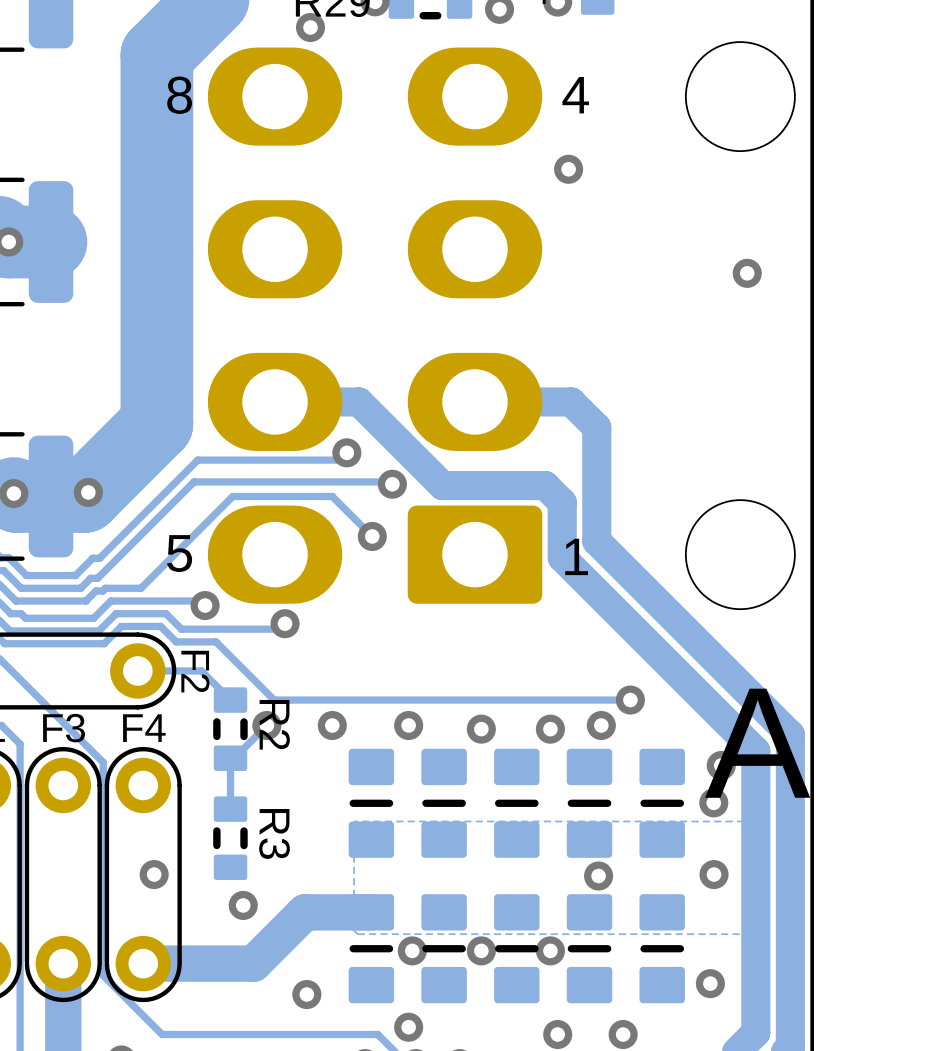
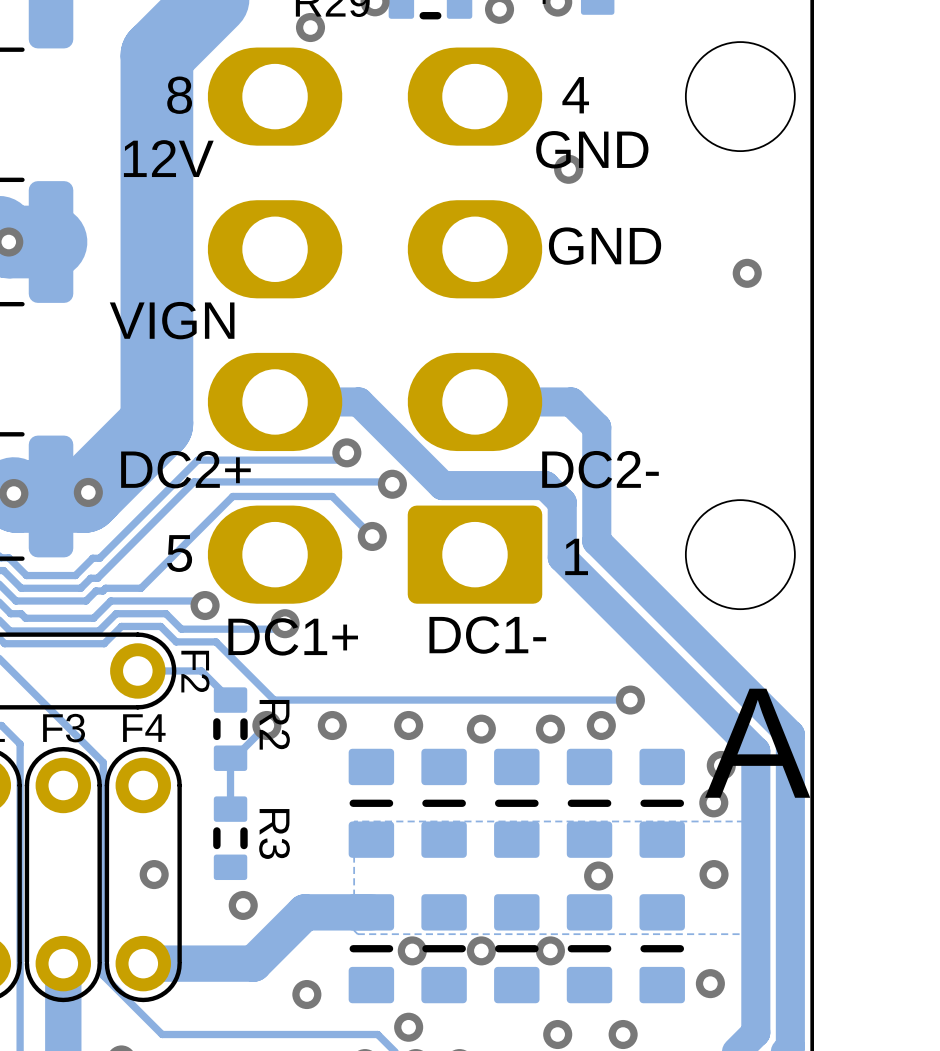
text: none -> GND (592, 149)
text: none -> 12V (168, 158)
text: none -> GND (605, 246)
text: none -> VIGN (172, 320)
text: none -> DC2+ (185, 469)
text: none -> DC2- (600, 469)
text: none -> DC1- (487, 635)
text: none -> DC1+ (293, 636)

